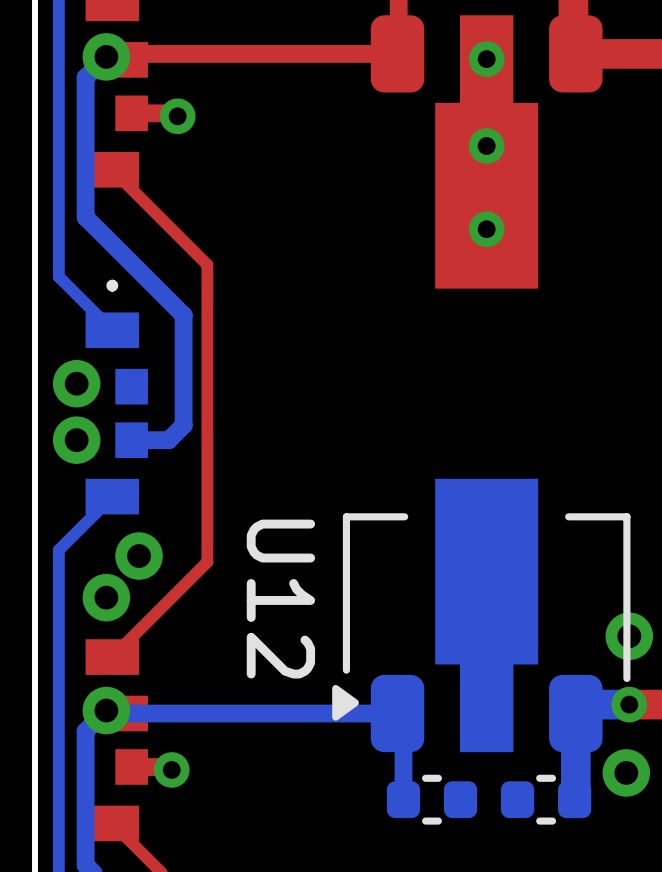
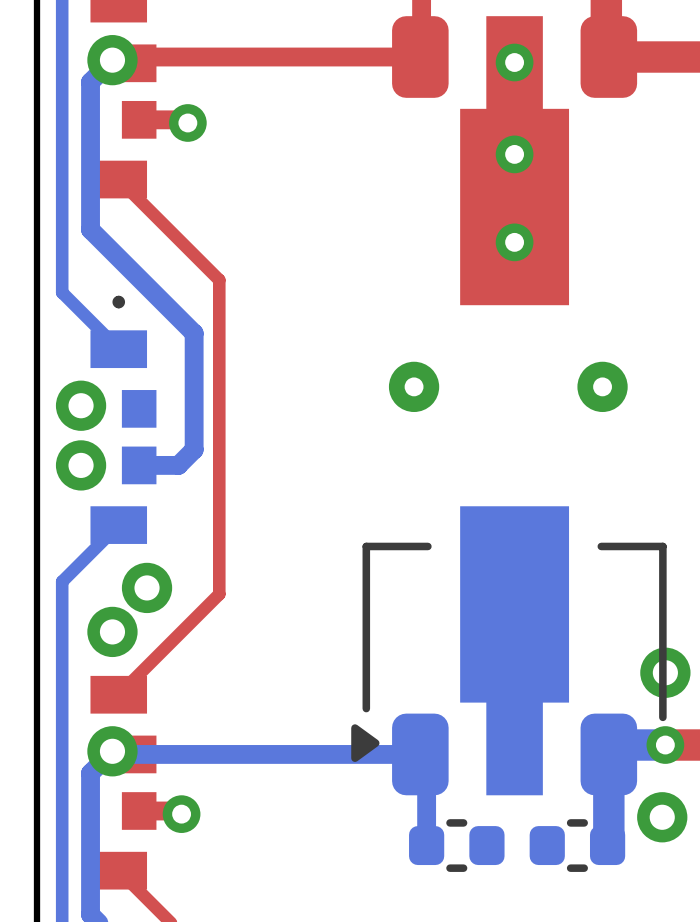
via: none -> (414, 386)
via: none -> (602, 386)
U12 name: U12 (280, 599) -> none

